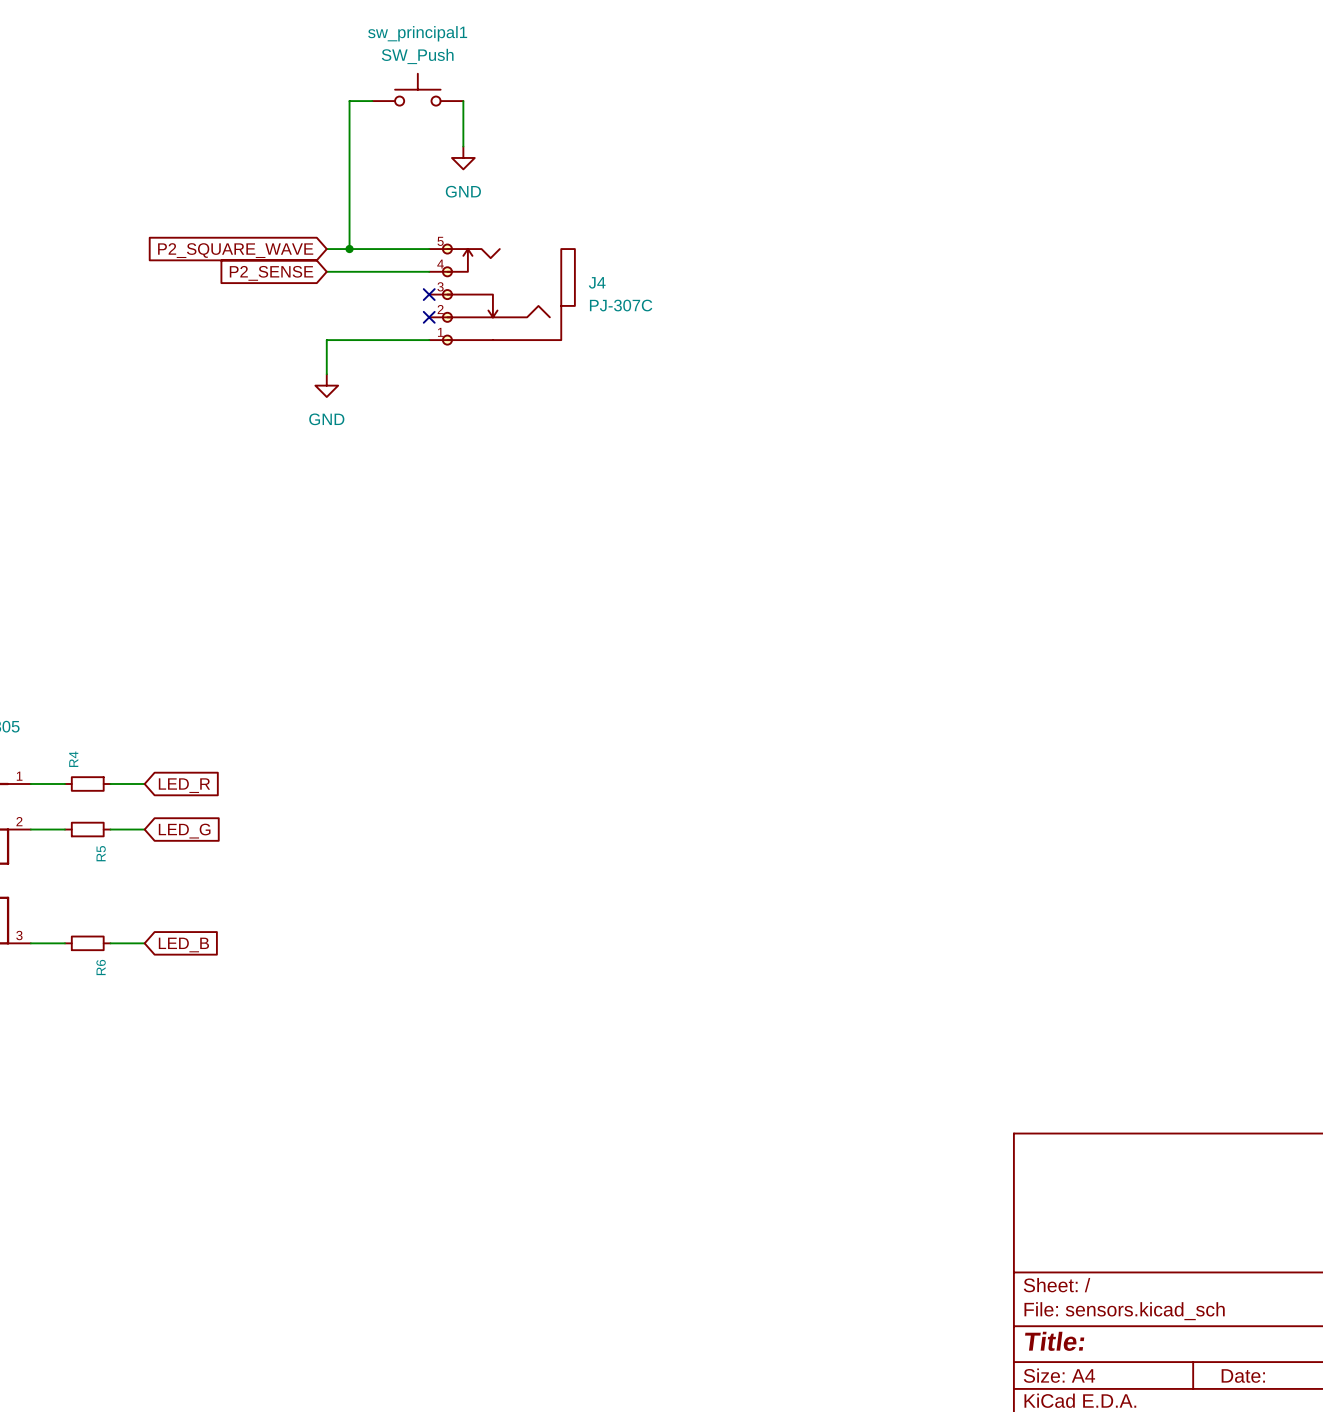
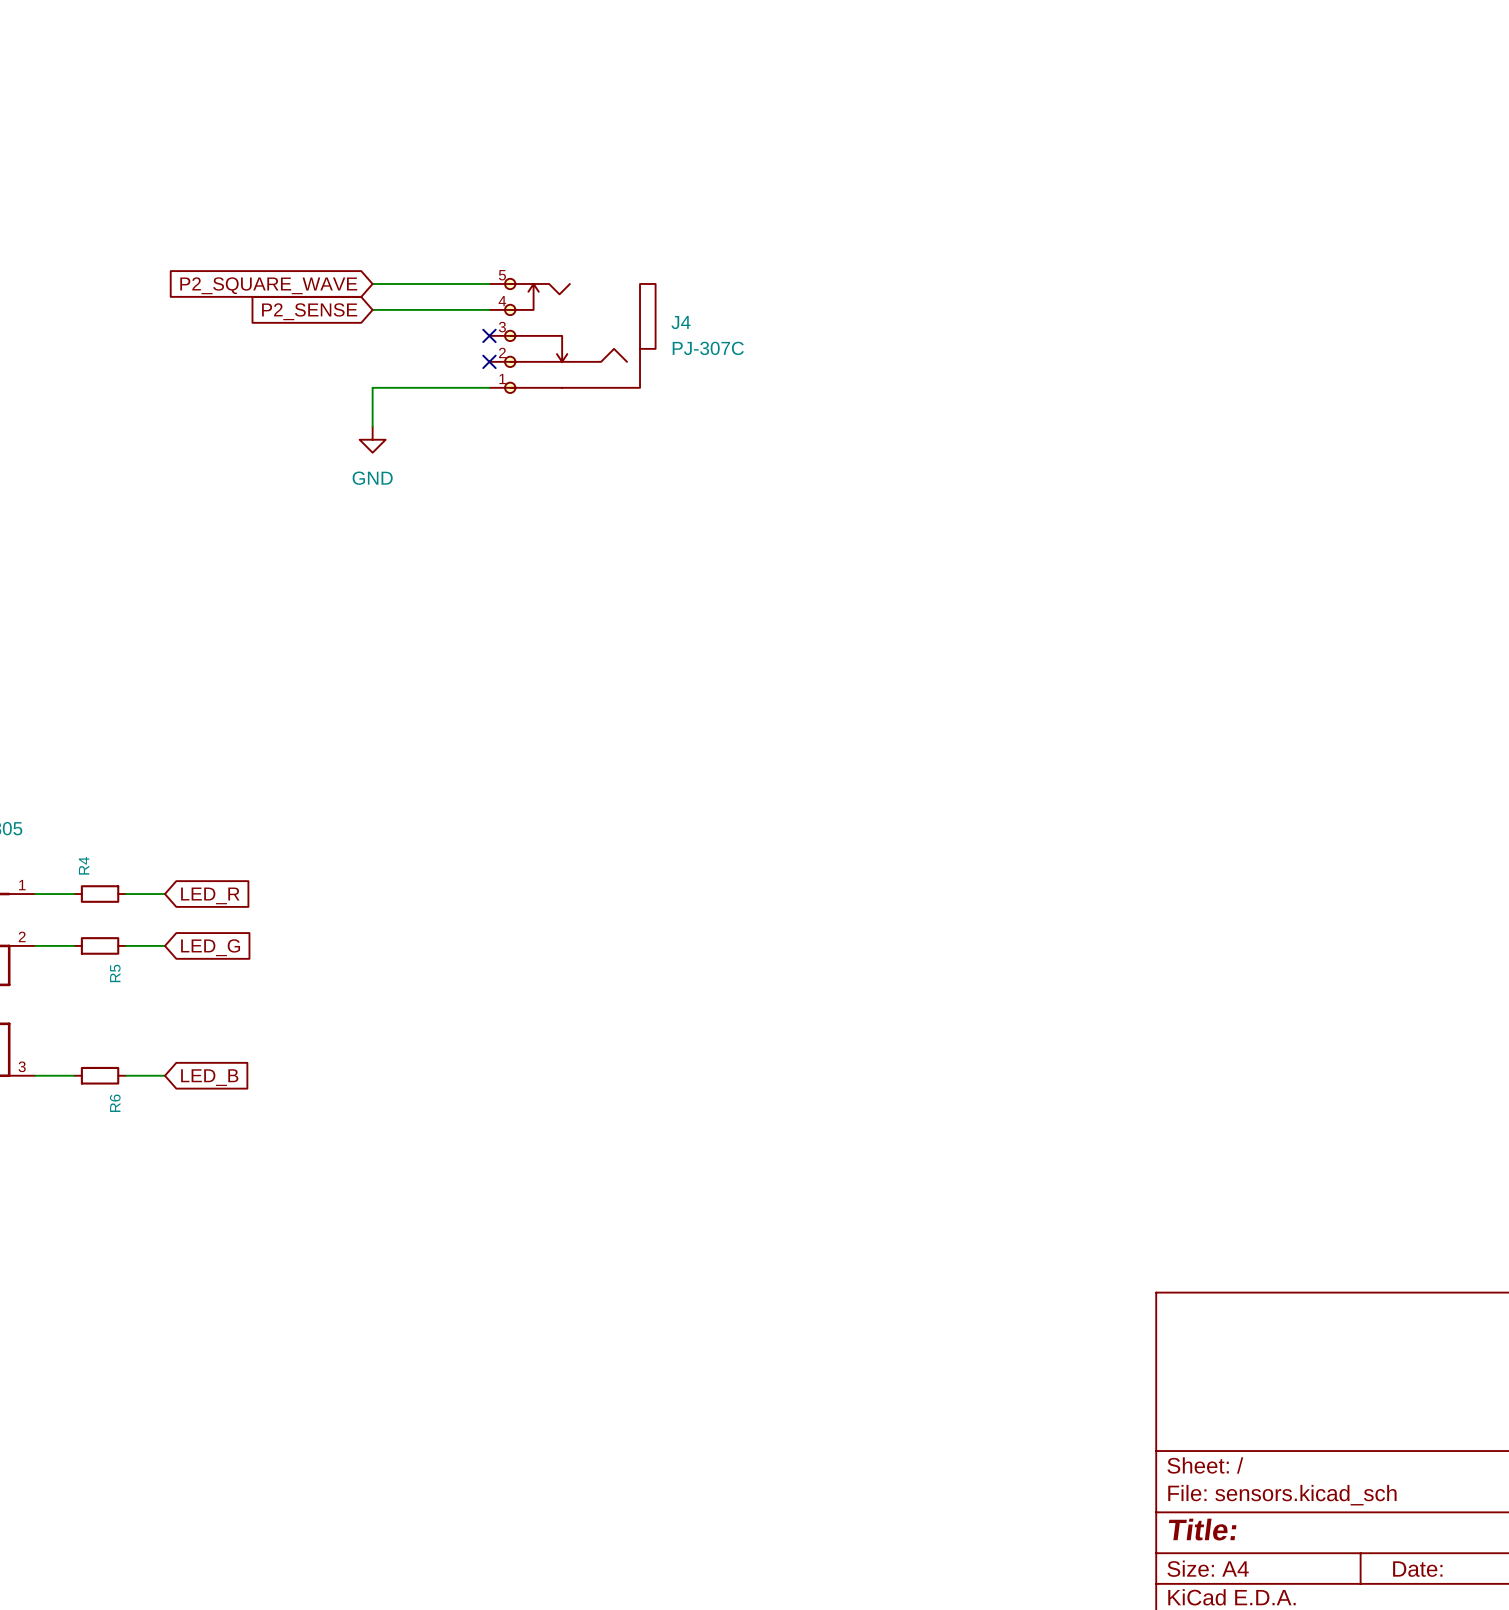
sw_principal1: SW_Push (417, 89) -> none
wire: (372, 101) (349, 101) (349, 249) -> none
wire: (463, 101) (463, 146) -> none
power symbol: GND (463, 157) -> none
junction: (349, 249) -> none

